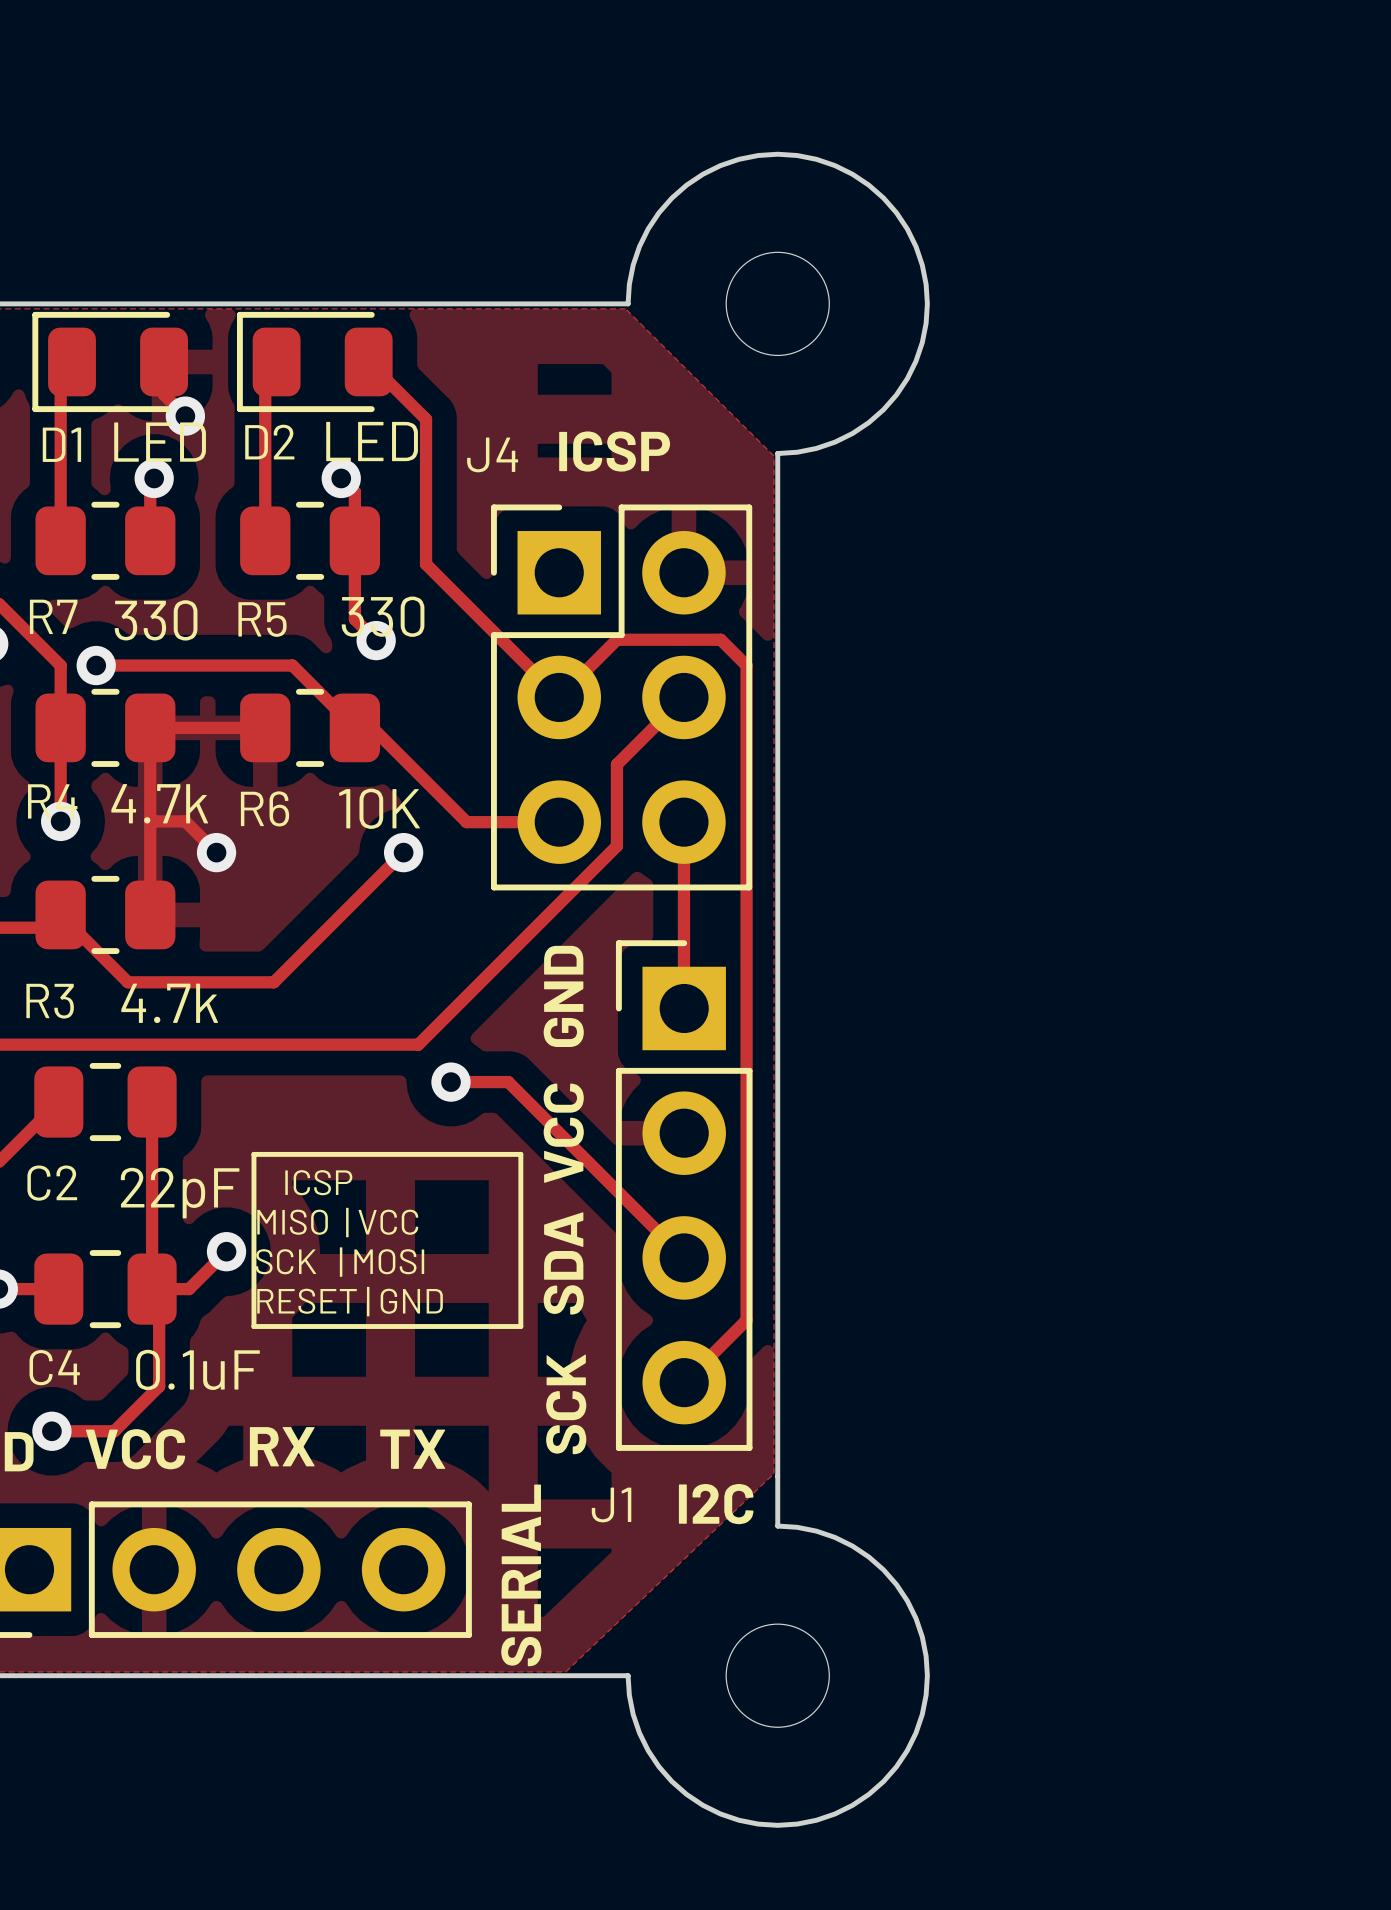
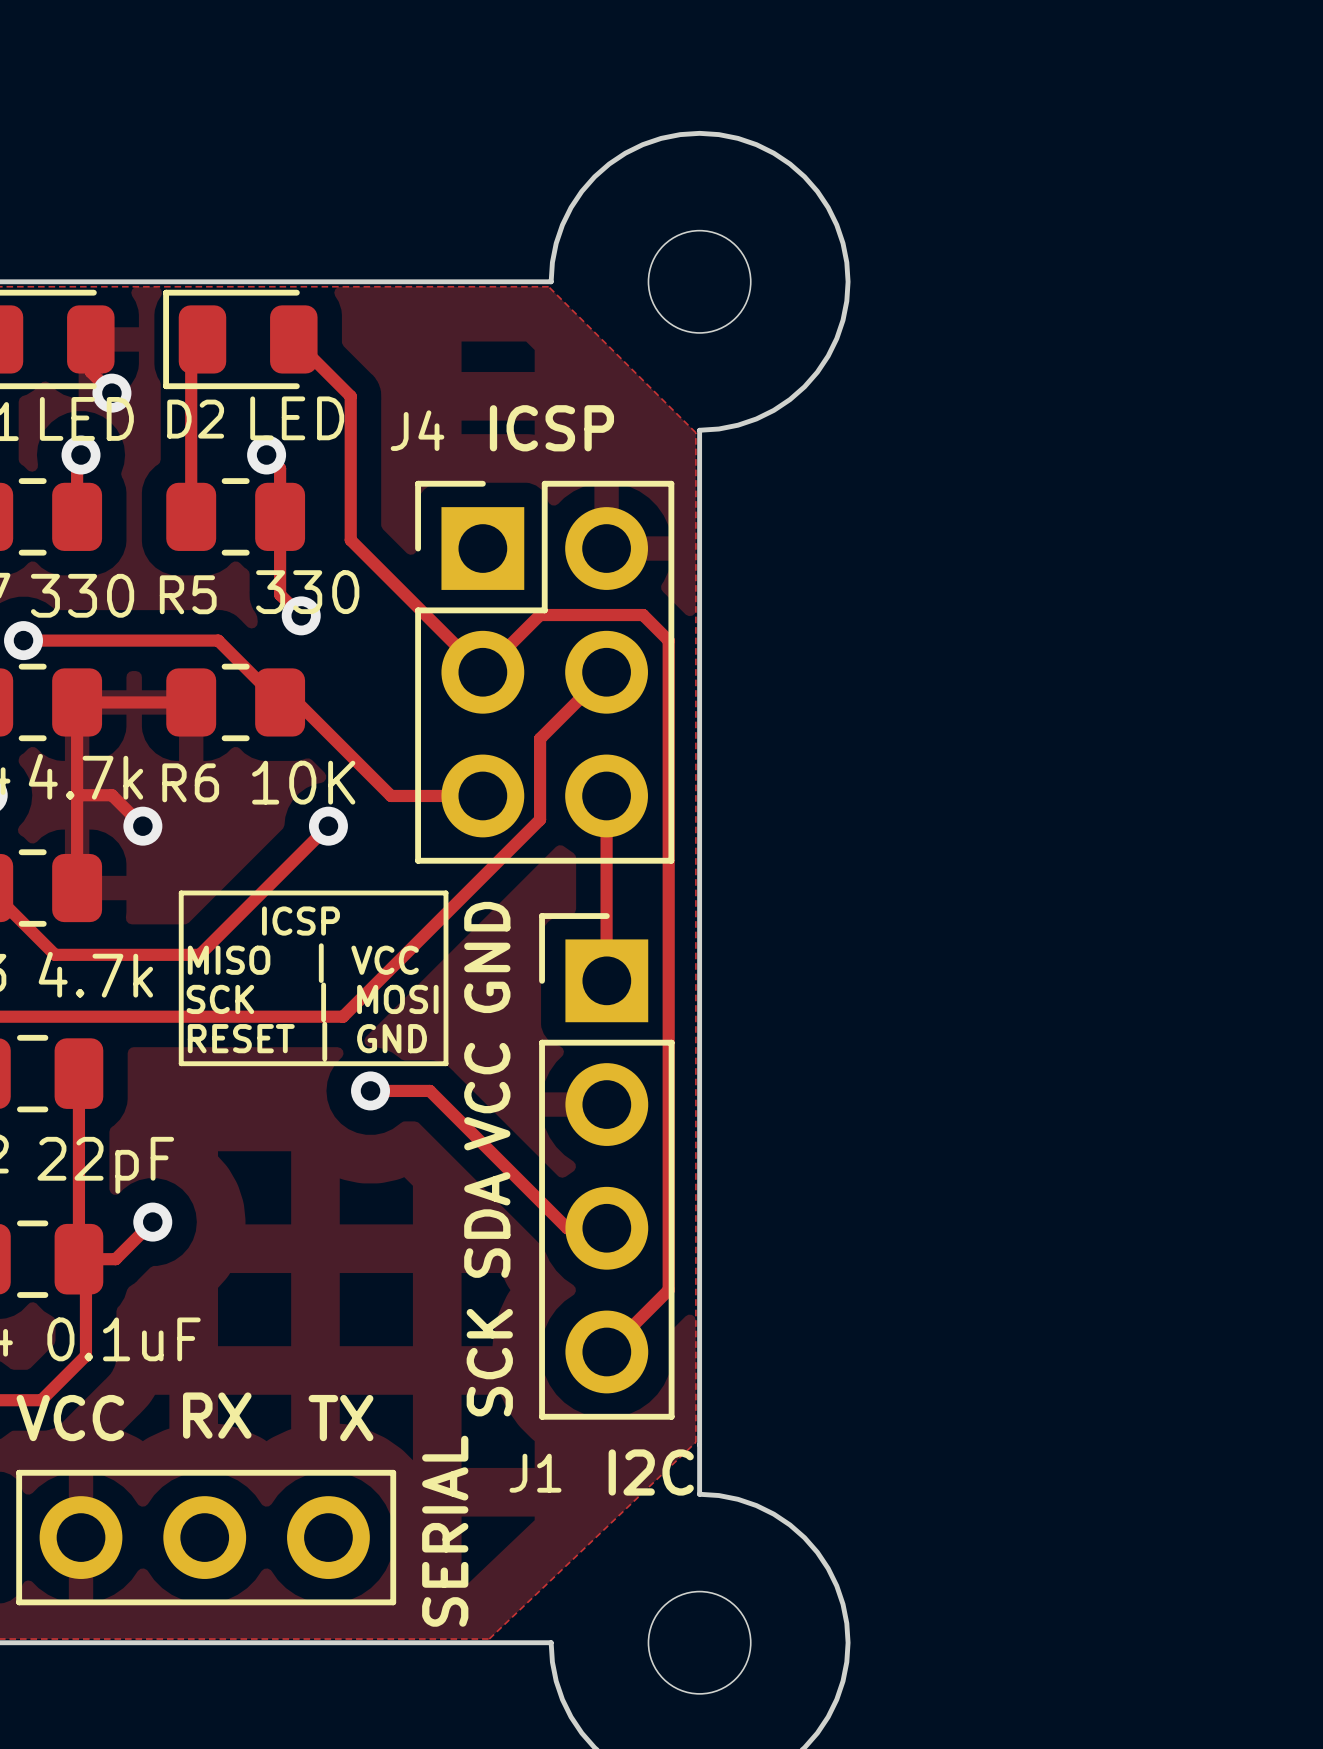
track: (451, 1082) (508, 1082) (684, 1257) -> (370, 1090) (429, 1090) (567, 1228) (606, 1228)
via position: (451, 1082) -> (370, 1090)
line: (253, 1154) (520, 1154) (520, 1326) (253, 1326) (253, 1154) -> (181, 892) (445, 892) (445, 1063) (181, 1063) (181, 892)
text position: ICSP (318, 1182) -> ICSP (300, 921)
text position: MISO | VCC (337, 1222) -> MISO | VCC (303, 963)
text position: SCK | MOSI (339, 1262) -> SCK | MOSI (312, 1002)
text position: RESET | GND (350, 1301) -> RESET | GND (307, 1041)

